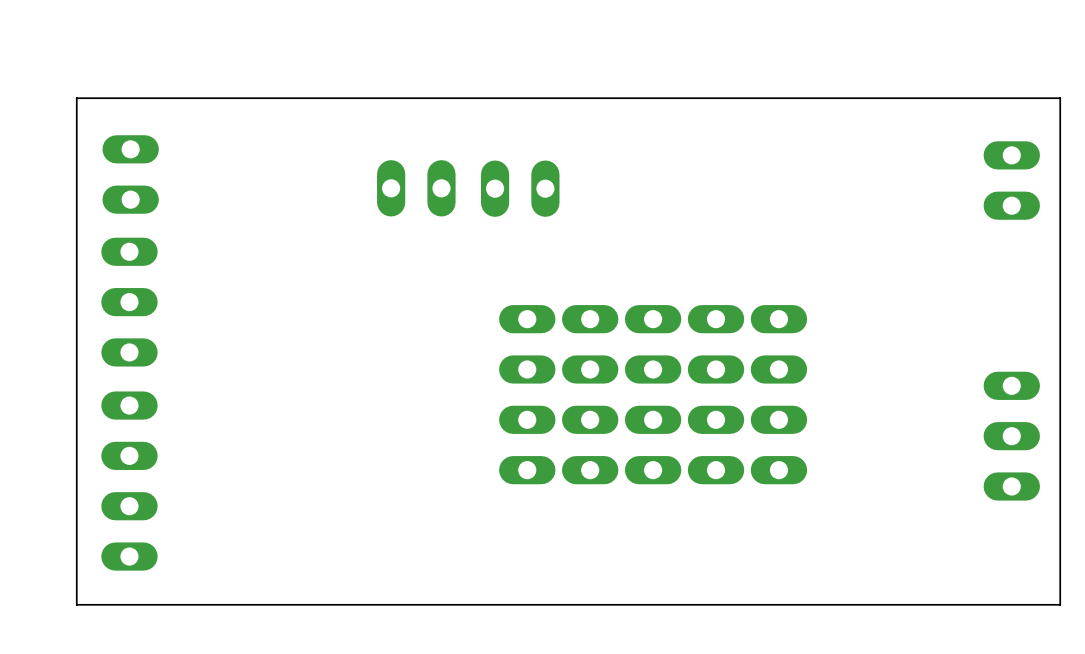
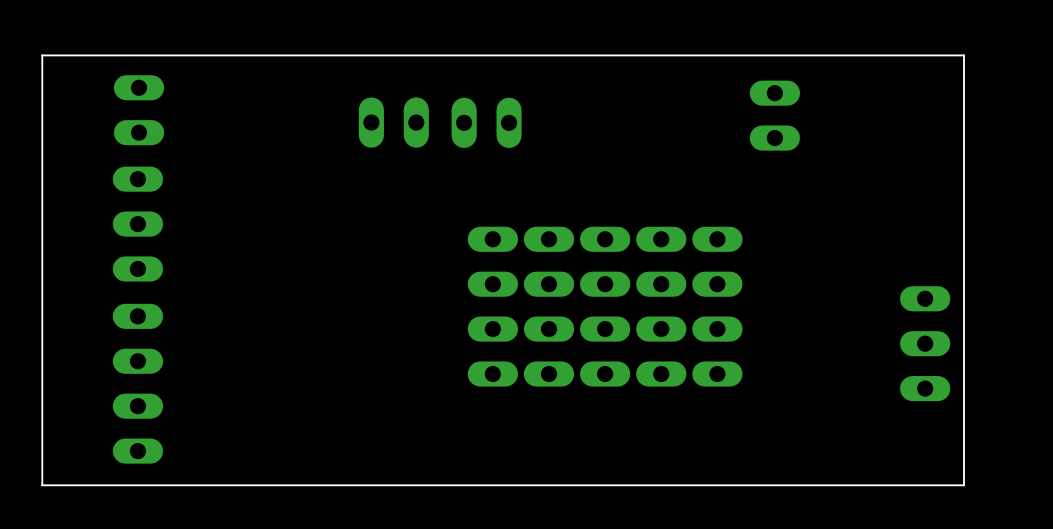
board edge: (1060, 98) (76, 98) (76, 604) (1060, 604) (1060, 98) -> (963, 55) (963, 485) (42, 485) (42, 55) (963, 55)
part position: (1011, 180) -> (774, 115)

